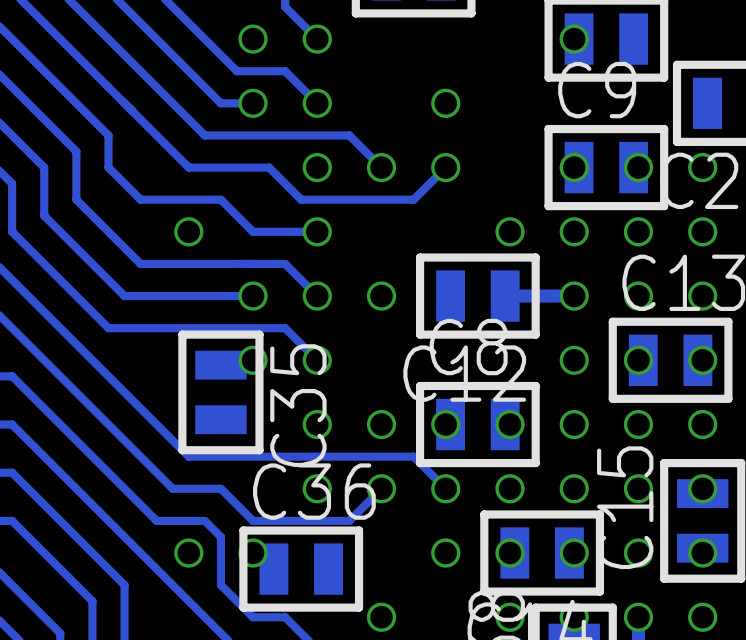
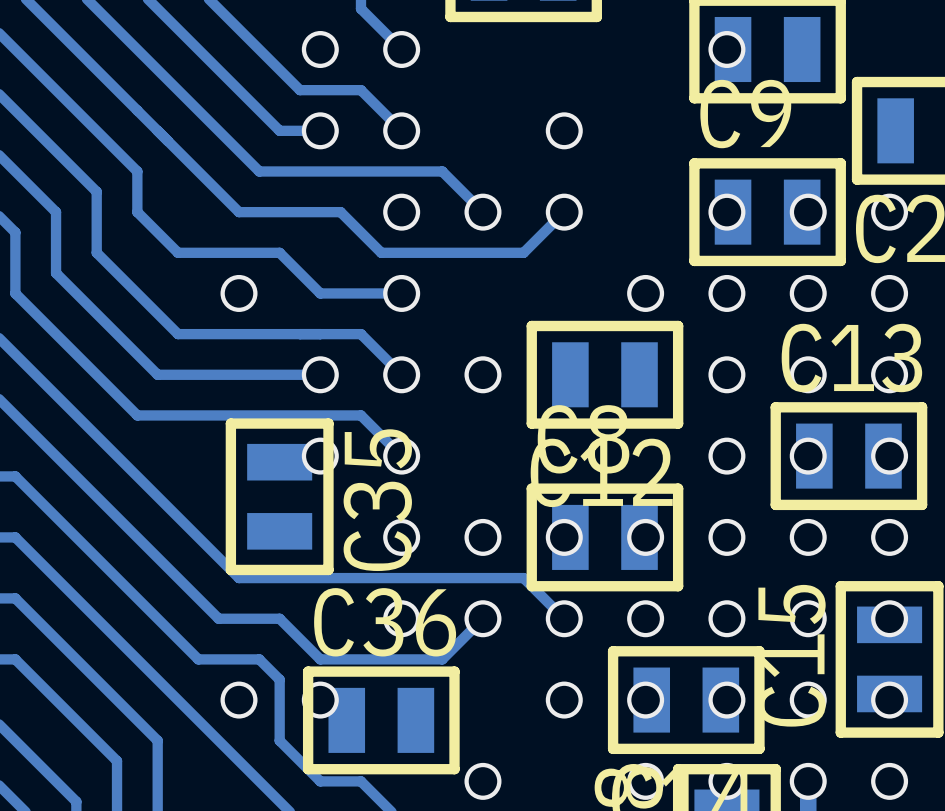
track: (574, 296) (505, 296) -> none

